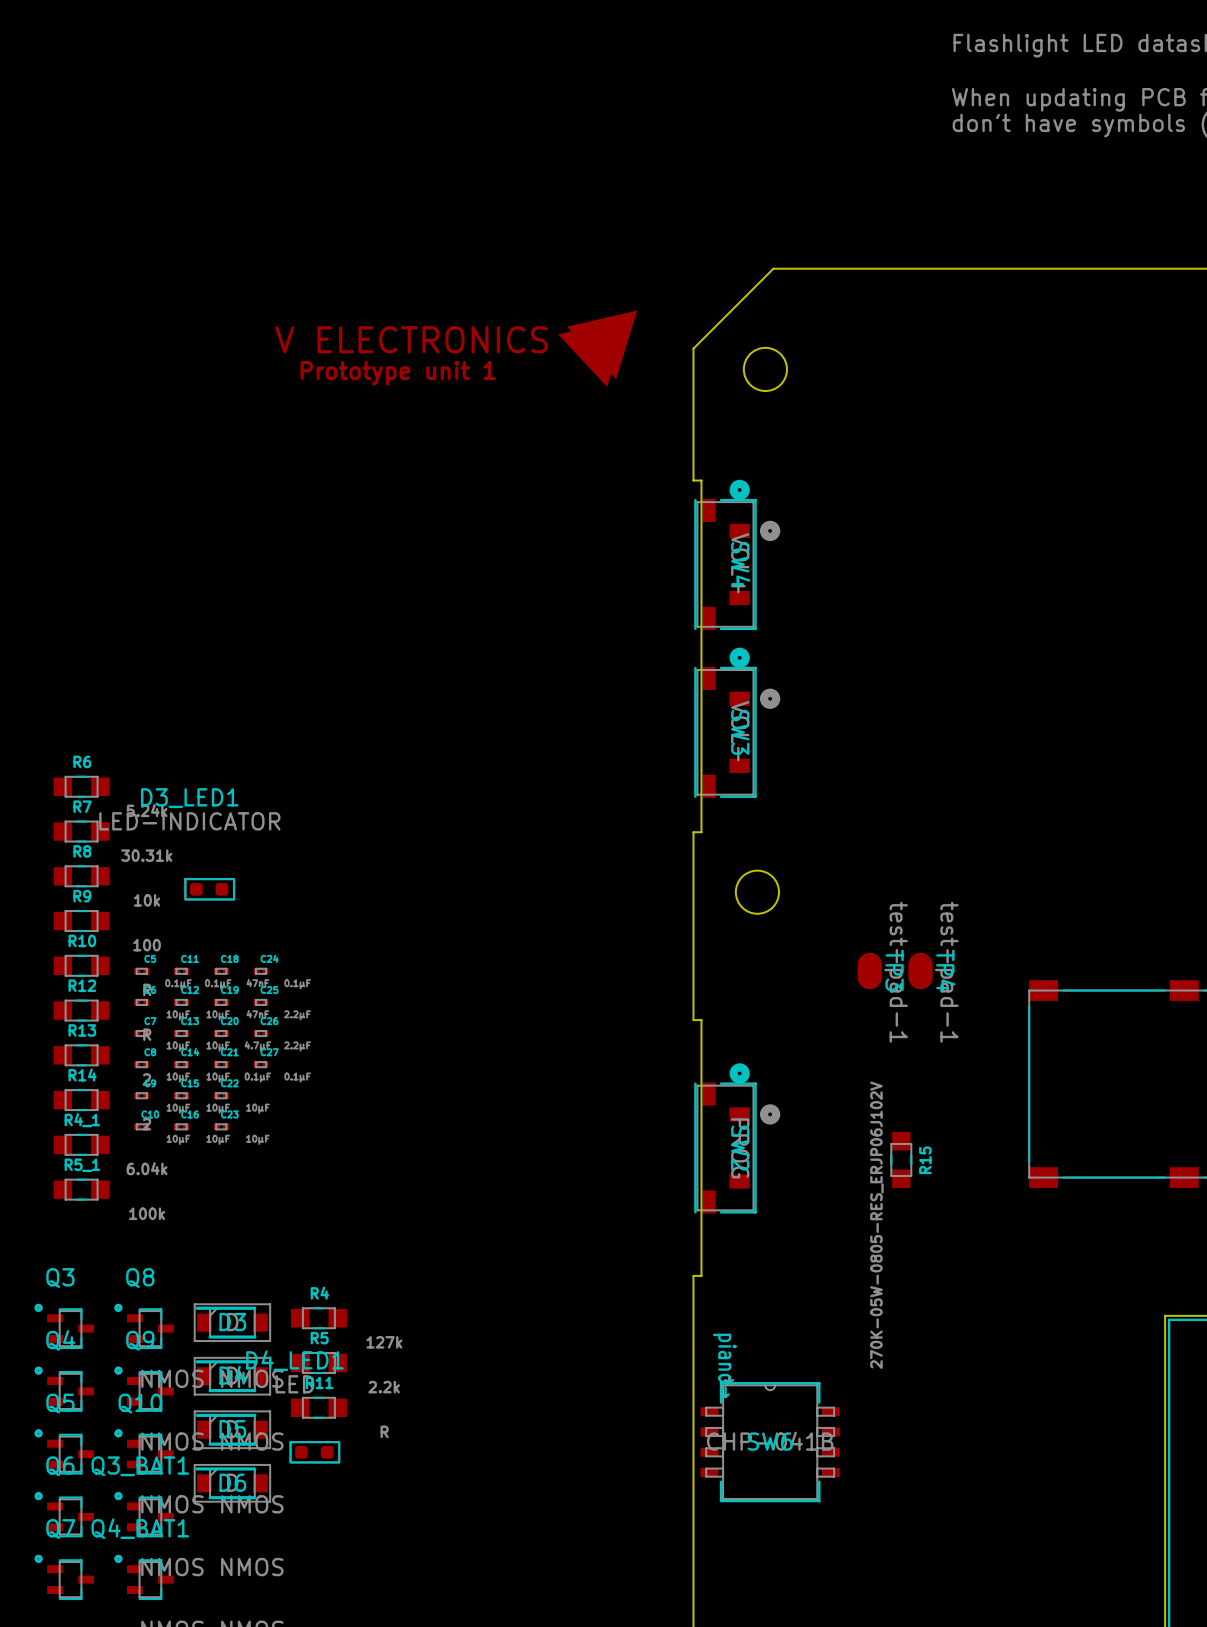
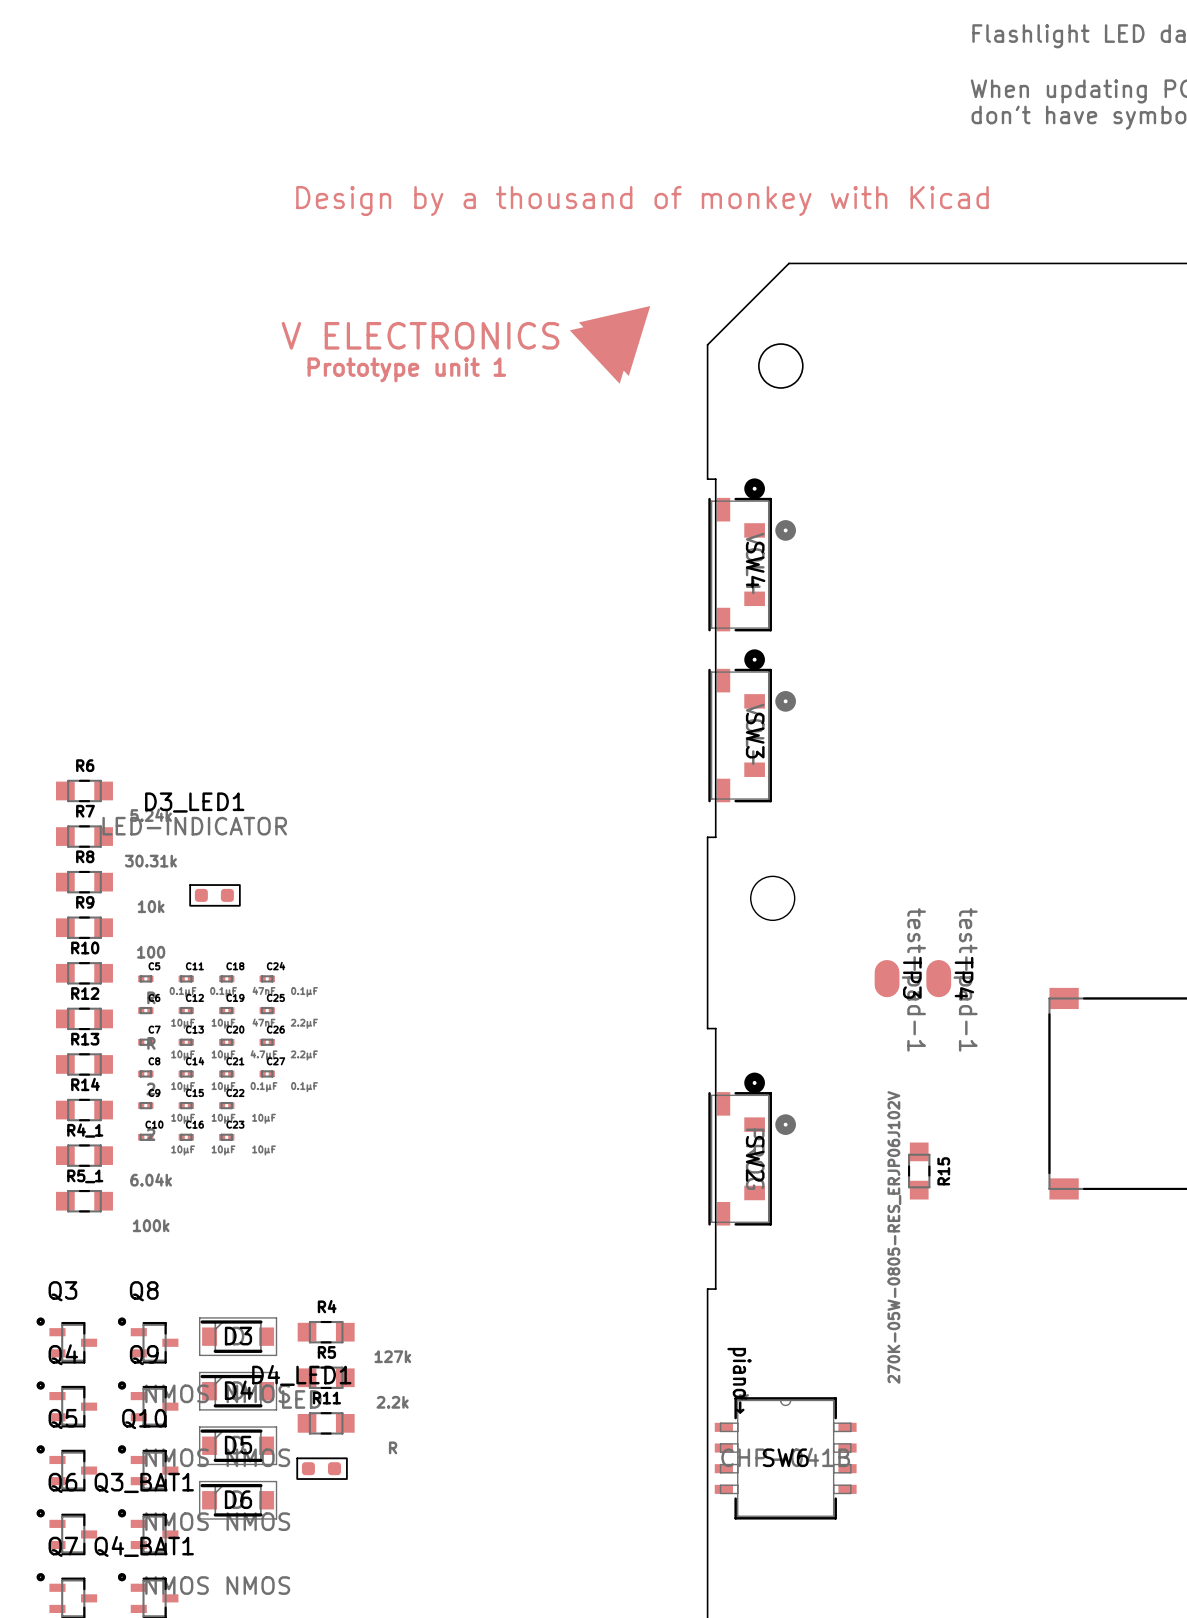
text: none -> Design by a thousand of monkey with Kicad (642, 201)

